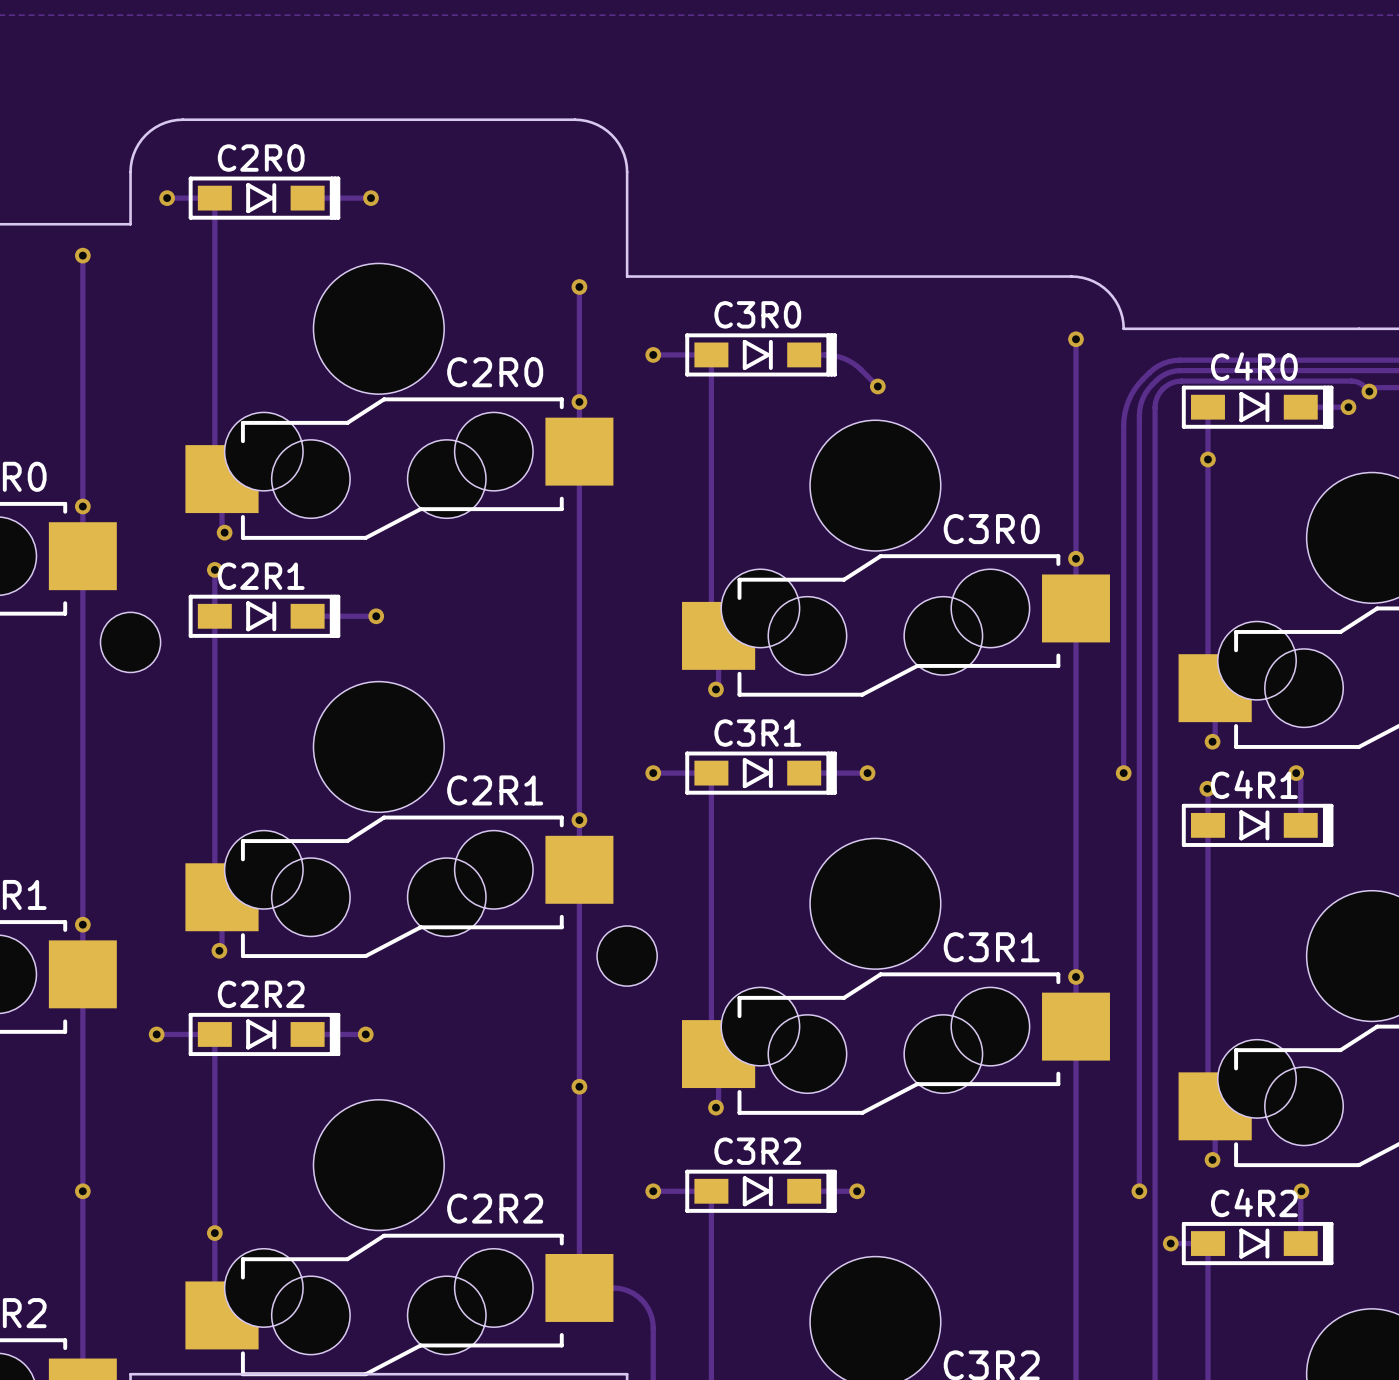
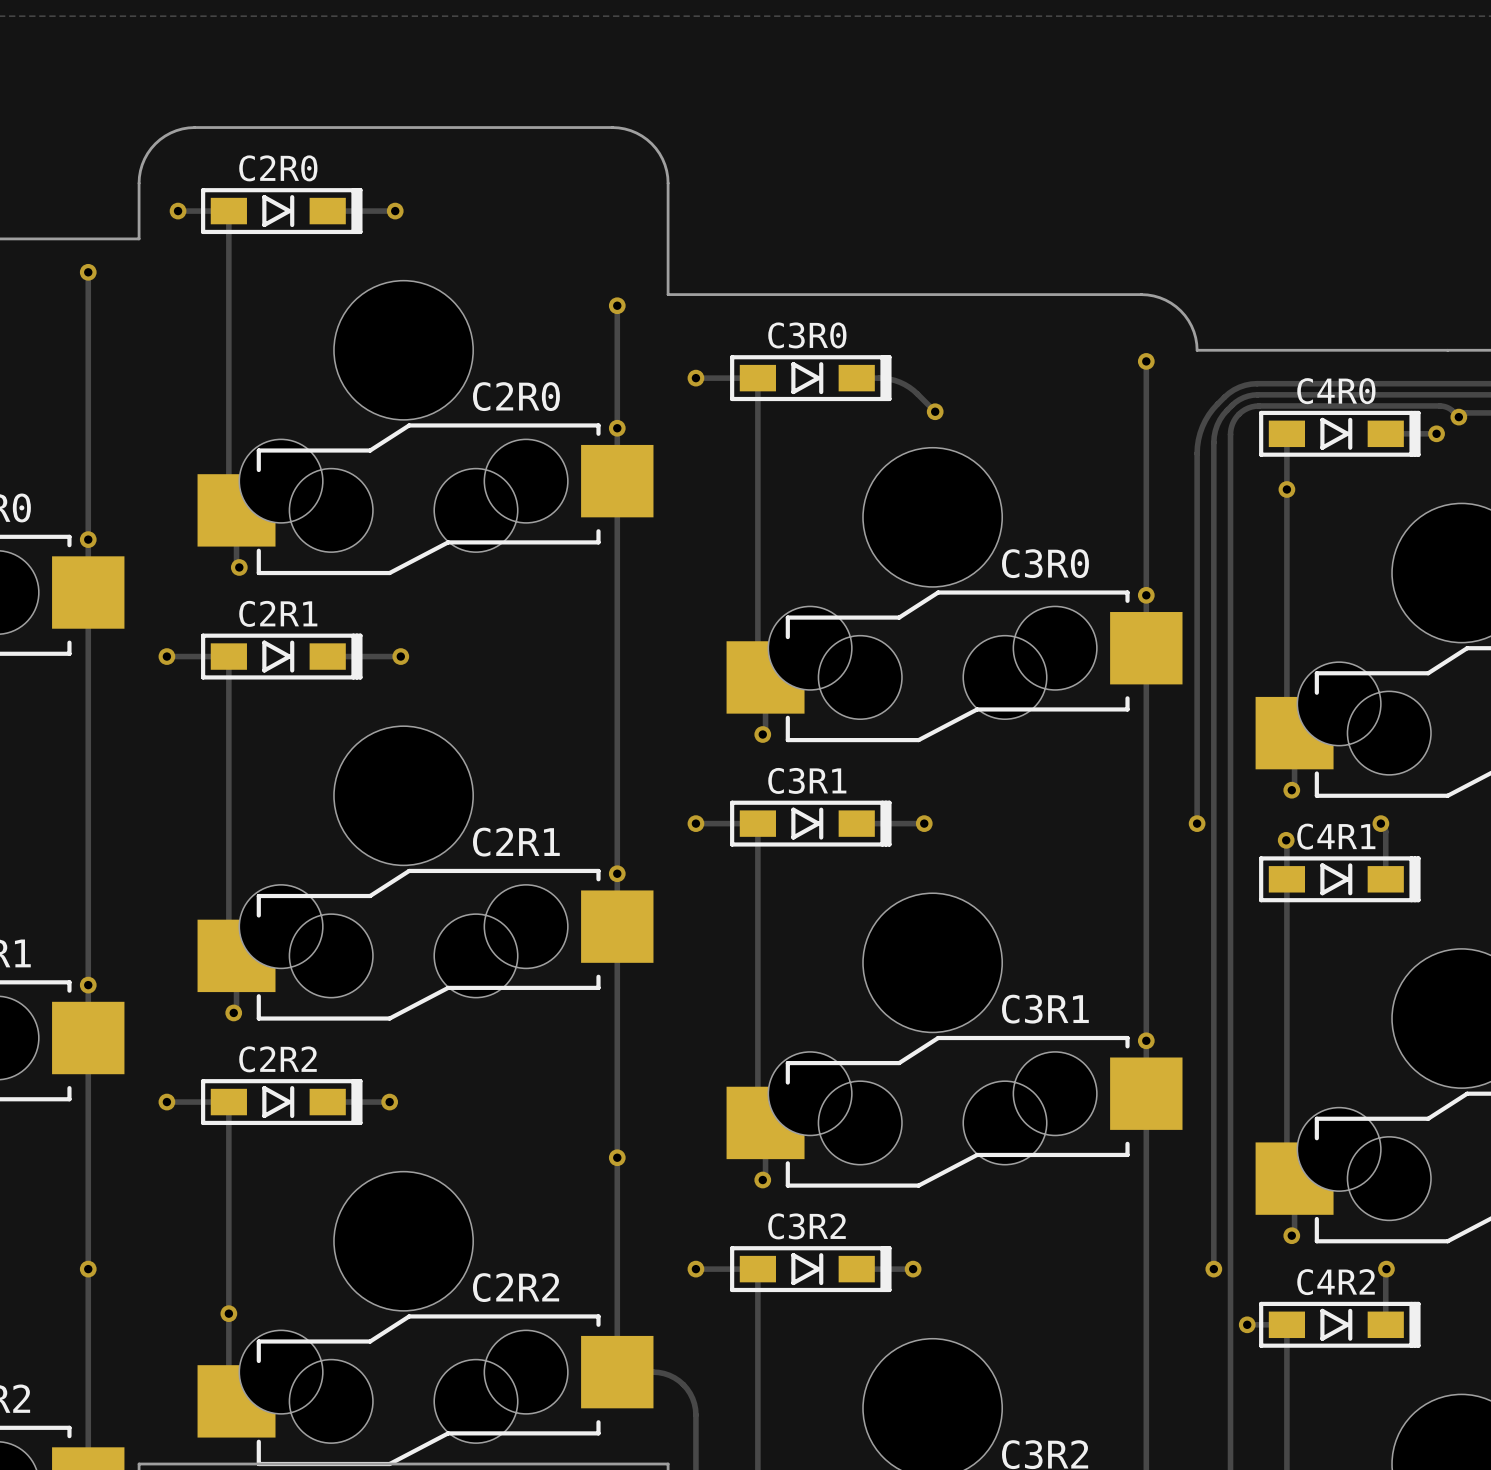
track: (214, 569) (214, 616) -> (166, 656) (228, 656)
via position: (214, 569) -> (166, 656)
part: (130, 642) -> none
part: (627, 956) -> none

